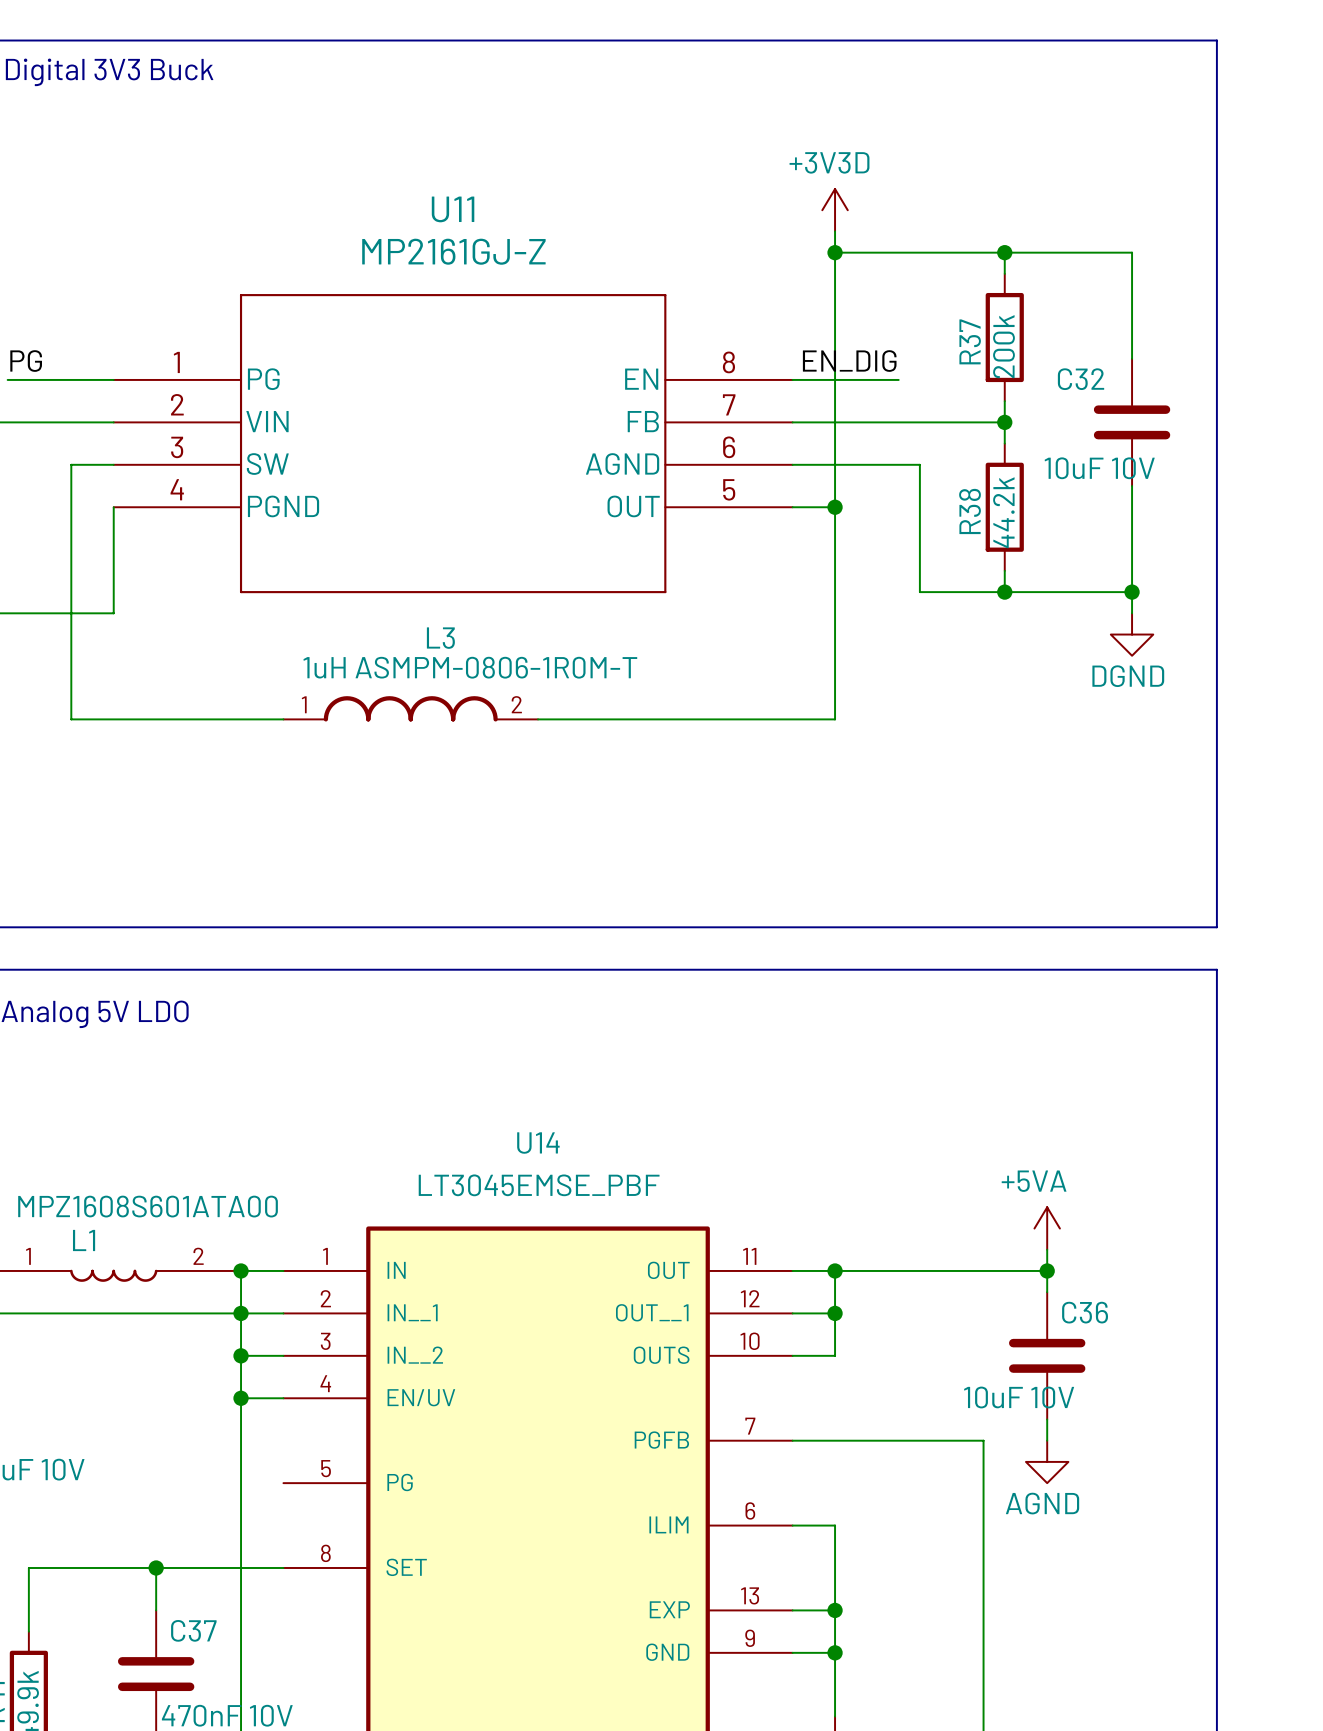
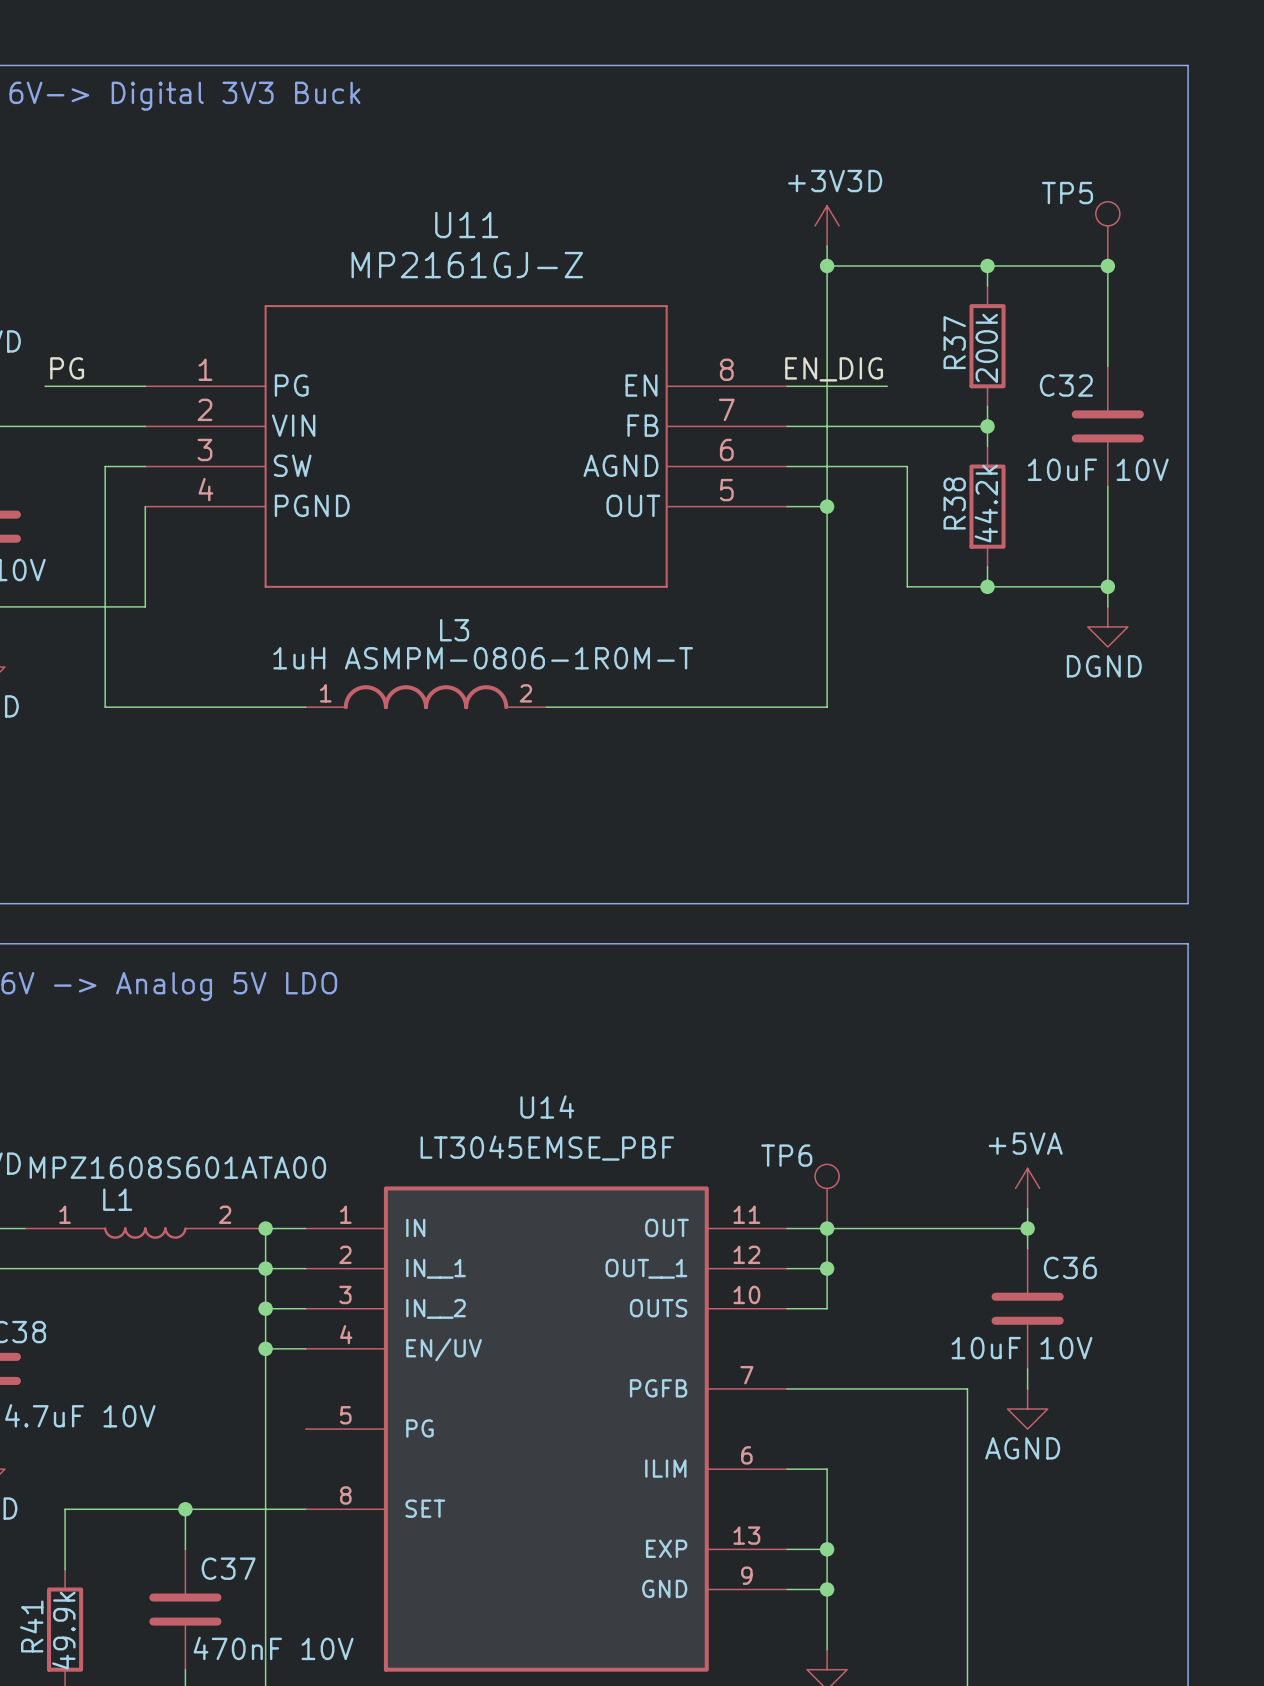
TP5: none -> (1107, 233)
junction: none -> (1107, 265)
TP6: none -> (827, 1196)

